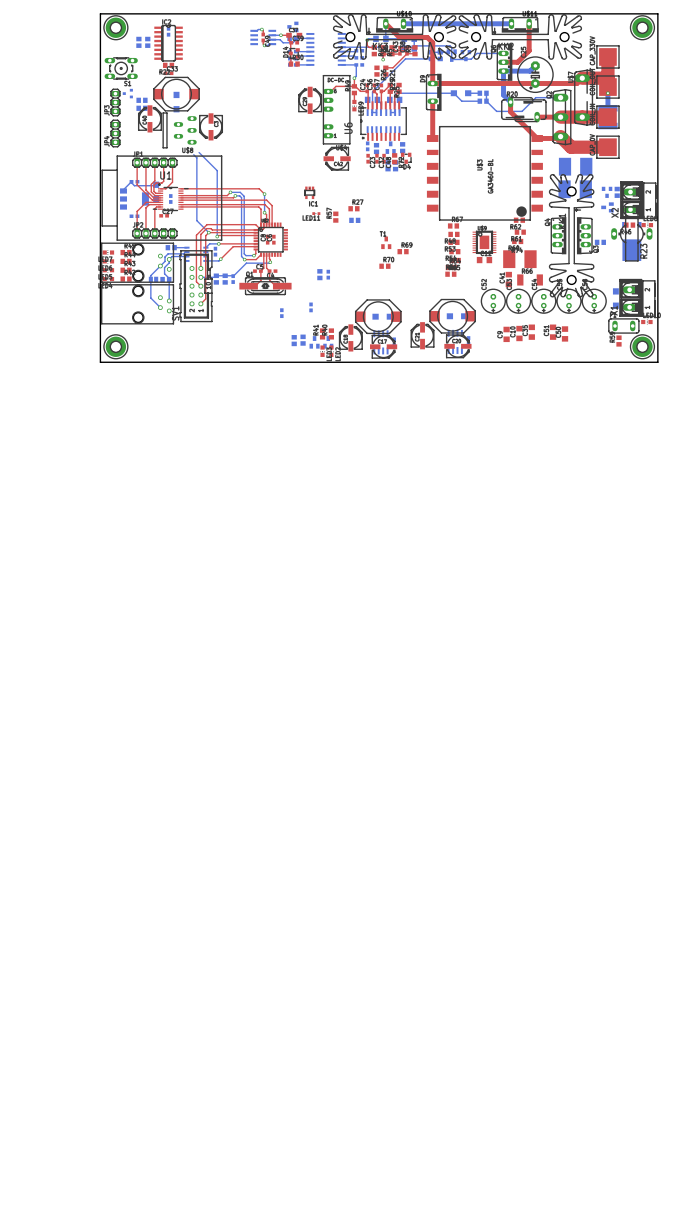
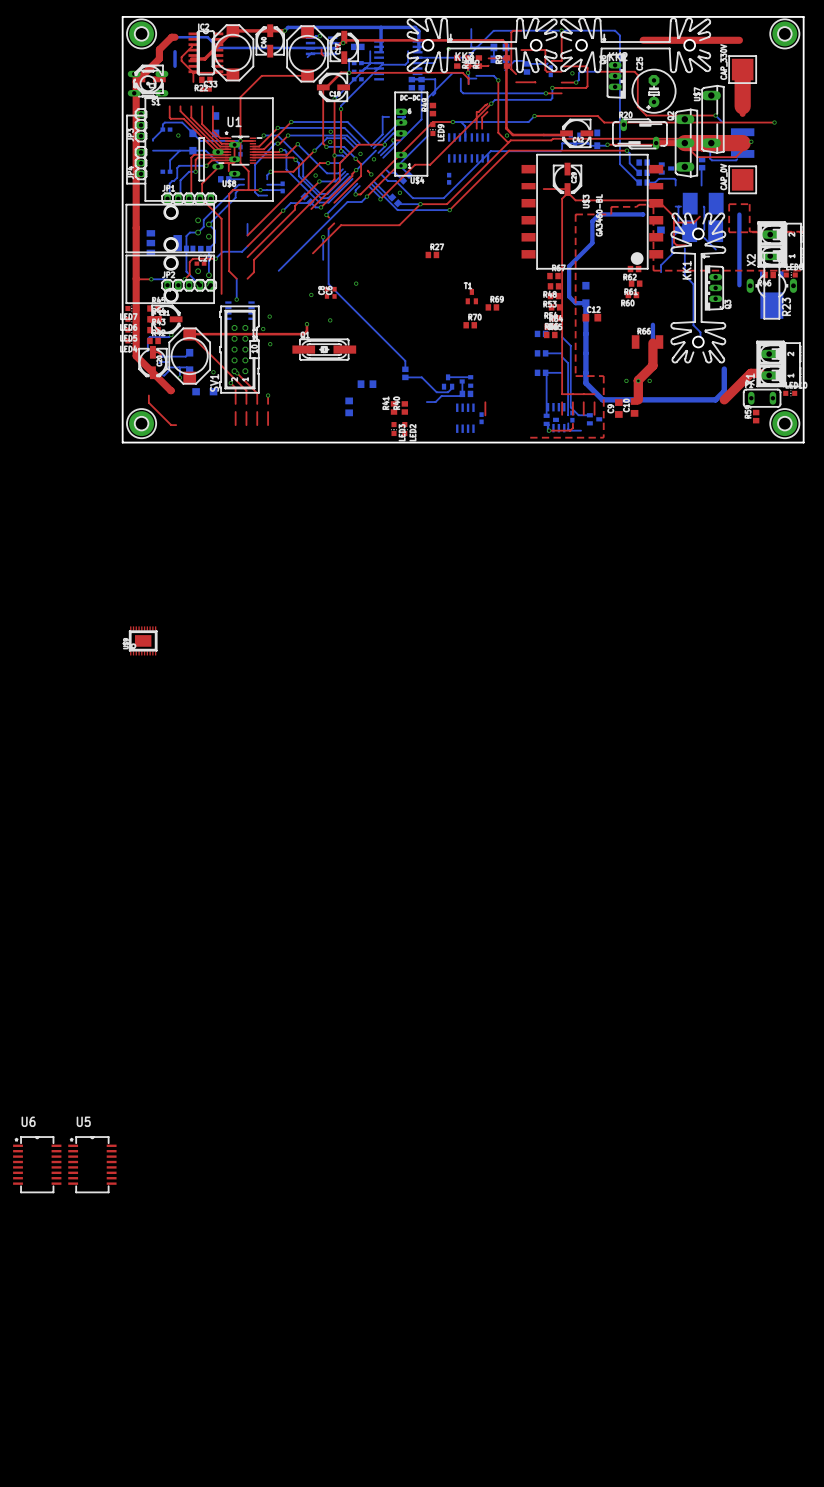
bottom track: none -> (381, 27) (381, 51)
top track: (385, 23) (399, 37) (427, 37) (432, 42) (432, 83) (576, 83) (582, 78) (607, 78) -> none
bottom track: (403, 23) (511, 23) -> none
top track: (529, 23) (529, 50) (517, 62) (503, 62) -> none
part: (394, 24) -> none
part: (520, 24) -> none
bottom track: none -> (284, 30) (288, 27) (415, 27) (418, 31) (418, 51)
top track: none -> (284, 30) (232, 30) (204, 58) (191, 58)
via: none -> (284, 30)
top track: none -> (521, 30) (511, 32) (511, 69) (516, 74)
top track: none -> (561, 30) (561, 60) (550, 62)
via: none -> (561, 30)
part: (292, 26) -> none
top track: (261, 29) (263, 34) -> none
bottom track: none -> (175, 37) (207, 37) (218, 47) (337, 46)
top track: none -> (175, 37) (171, 37) (159, 49) (159, 58) (136, 82) (136, 356) (171, 390)
part: (168, 31) -> none
top track: none -> (643, 40) (739, 40)
top track: (280, 35) (288, 35) (288, 40) (291, 42) (290, 64) -> none
part: (294, 35) -> none
top track: none -> (191, 44) (191, 46) (181, 57) (181, 60) (193, 72) (232, 74)
part: (263, 37) -> none
top track: none -> (337, 46) (344, 39) (502, 40) (506, 44) (506, 128) (512, 134) (564, 134) (566, 133)
bottom track: (310, 38) (296, 38) (292, 42) (272, 39) -> none
bottom track: (375, 38) (367, 40) -> none
part: (380, 38) -> none
top track: (367, 40) (367, 45) (374, 47) -> none
top track: none -> (521, 50) (545, 50) (545, 70) (561, 71)
bottom track: none -> (370, 51) (370, 63) (334, 99)
bottom track: none -> (408, 51) (408, 62) (405, 64) (382, 64) (341, 105) (341, 109)
part: (138, 42) -> none
bottom track: none -> (175, 51) (175, 66)
part: (147, 42) -> none
part: (294, 42) -> none
part: none -> (232, 52)
bottom track: none -> (328, 53) (311, 53) (307, 57)
part: none -> (307, 53)
via: (264, 45) -> none
bottom track: (414, 45) (449, 45) (451, 47) (451, 59) (471, 59) (476, 53) (503, 53) -> none
top track: (392, 47) (395, 50) (403, 50) (407, 53) -> none
bottom track: none -> (349, 58) (349, 72)
bottom track: none -> (523, 60) (514, 60) (505, 70)
part footprint: [446, 49, 457, 62] -> [548, 65, 553, 78]
part: (359, 50) -> none
part: (399, 50) -> none
part: (407, 50) -> none
part: (294, 53) -> none
top track: (407, 53) (415, 54) -> none
top track: (407, 53) (392, 67) (385, 67) -> none
top track: none -> (561, 66) (585, 66) (587, 86) (585, 87) (552, 87)
part: (440, 55) -> none
part position: (465, 55) -> (575, 139)
bottom track: (341, 56) (354, 56) (356, 57) -> none
part: (359, 57) -> none
bottom track: (431, 58) (405, 58) (372, 91) (372, 112) (376, 112) -> none
bottom track: none -> (599, 71) (580, 71) (578, 79) (576, 82)
top track: none -> (599, 71) (634, 71) (637, 74) (637, 106) (646, 115) (715, 115)
top track: none -> (193, 72) (193, 82)
via: none -> (349, 72)
bottom track: none -> (460, 73) (452, 73) (427, 98) (427, 136) (398, 164) (408, 174)
via: none -> (572, 73)
top track: none -> (307, 75) (261, 75) (240, 97) (240, 163) (248, 171) (248, 190)
bottom track: none -> (476, 75) (493, 75) (498, 80)
part: (294, 64) -> none
bottom track: (295, 64) (310, 64) -> none
part: (359, 64) -> none
bottom track: none -> (460, 78) (460, 90) (463, 93) (545, 93)
bottom track: none -> (468, 78) (476, 78)
top track: none -> (498, 80) (498, 132) (508, 142)
via: none -> (498, 80)
bottom track: (535, 65) (530, 71) (503, 71) (503, 95) (510, 102) -> none
top track: none -> (516, 82) (535, 82)
top track: none -> (561, 82) (576, 82)
via: none -> (576, 82)
part: none -> (411, 83)
part: none -> (421, 83)
bottom track: none -> (468, 84) (468, 55) (493, 30) (615, 30) (619, 35) (619, 164) (639, 182)
top track: none -> (468, 84) (468, 78) (462, 72) (341, 72) (326, 87) (323, 87) (323, 96)
bottom track: none -> (421, 87) (421, 119) (383, 157)
part: (376, 71) -> none
part: (385, 71) -> none
bottom track: none -> (552, 87) (550, 99) (495, 99) (491, 103)
via: none -> (552, 87)
top track: none -> (545, 93) (561, 93)
via: none -> (545, 93)
top track: none -> (323, 96) (323, 143) (326, 146)
top track: (354, 78) (354, 86) -> none
via: (354, 78) -> none
top track: none -> (334, 99) (334, 179) (254, 259) (254, 272) (247, 278)
via: none -> (334, 99)
top track: none -> (491, 103) (430, 164) (415, 164) (380, 199)
via: none -> (491, 103)
top track: (390, 85) (381, 91) (381, 105) -> none
top track: none -> (169, 106) (170, 118) (183, 118) (217, 152) (228, 152)
top track: none -> (180, 106) (180, 111) (218, 149) (228, 149)
top track: none -> (191, 106) (191, 117) (220, 146) (228, 146)
top track: none -> (202, 106) (202, 124) (221, 143) (228, 143)
top track: none -> (212, 106) (212, 130) (220, 138) (228, 138)
part: (607, 87) -> none
part: (367, 88) -> none
part: (374, 88) -> none
part: (381, 88) -> none
part: (390, 88) -> none
part: (399, 88) -> none
top track: none -> (341, 109) (341, 151)
via: none -> (341, 109)
top track: (328, 91) (336, 86) (355, 86) (360, 91) (368, 92) (368, 105) -> none
top track: (374, 91) (376, 93) (376, 105) -> none
part: (433, 92) -> none
part: (127, 93) -> none
top track: (354, 93) (354, 101) -> none
part: (461, 93) -> none
bottom track: (468, 93) (479, 93) -> none
part: (483, 93) -> none
bottom track: (486, 93) (486, 101) (496, 111) (522, 111) (535, 97) (560, 97) -> none
bottom track: (607, 93) (607, 108) -> none
via: (607, 93) -> none
part: (176, 94) -> none
bottom track: none -> (715, 115) (721, 121)
via: none -> (715, 115)
bottom track: none -> (389, 116) (382, 116) (382, 134) (371, 145)
bottom track: none -> (397, 116) (404, 116) (373, 148)
bottom track: none -> (534, 116) (528, 122) (452, 122)
top track: none -> (534, 116) (597, 116) (604, 122) (774, 122)
via: none -> (534, 116)
bottom track: none -> (291, 122) (347, 122) (368, 143)
top track: none -> (291, 122) (264, 149) (252, 149)
via: none -> (291, 122)
top track: none -> (452, 122) (432, 122) (360, 194) (355, 194)
via: none -> (452, 122)
part: (372, 99) -> none
part: (394, 99) -> none
part: (142, 100) -> none
part rotation: 0° (310, 100) -> 180° (567, 179)
part position: (310, 100) -> (567, 179)
via: none -> (774, 122)
top track: (432, 101) (432, 138) -> none
bottom track: (479, 101) (461, 101) (453, 93) (396, 93) (394, 95) (395, 112) (390, 112) -> none
part: (483, 101) -> none
top track: (510, 102) (510, 111) (537, 138) (558, 138) (560, 136) (571, 147) (607, 147) -> none
bottom track: none -> (277, 127) (344, 127) (359, 143)
top track: none -> (277, 127) (259, 146) (252, 146)
via: none -> (277, 127)
part: none -> (166, 129)
via: none -> (330, 131)
part: (142, 108) -> none
bottom track: none -> (398, 133) (393, 133) (384, 142) (384, 146) (378, 153)
via: none -> (178, 135)
bottom track: none -> (263, 135) (277, 135) (303, 160) (303, 176) (320, 193) (327, 193) (347, 174)
via: none -> (263, 135)
bottom track: none -> (288, 135) (347, 135) (357, 145)
top track: none -> (288, 135) (277, 143)
via: none -> (288, 135)
via: none -> (506, 135)
bottom track: none -> (393, 140) (393, 143) (380, 155)
top track: none -> (393, 140) (400, 140)
via: none -> (393, 140)
part: none -> (597, 139)
bottom track: none -> (153, 140) (162, 129) (164, 122) (182, 122) (200, 140) (240, 140) (240, 147)
top track: none -> (228, 140) (234, 142) (234, 162) (222, 163) (202, 183) (202, 199) (221, 218) (221, 293)
top track: none -> (240, 140) (252, 140)
via: none -> (240, 140)
part: none -> (192, 142)
via: none -> (330, 142)
bottom track: none -> (703, 142) (710, 149) (711, 160) (737, 159)
top track: none -> (751, 141) (735, 157) (697, 157) (684, 144) (607, 144)
via: none -> (751, 141)
bottom track: none -> (277, 143) (275, 143) (255, 164) (255, 192) (258, 195) (267, 195)
via: none -> (277, 143)
part: (607, 117) -> none
part position: (149, 118) -> (270, 40)
bottom track: none -> (297, 144) (326, 173) (338, 173) (342, 169)
top track: none -> (297, 144) (287, 154) (252, 154)
via: none -> (297, 144)
top track: none -> (384, 144) (358, 144) (339, 163) (339, 180) (311, 209)
via: none -> (384, 144)
bottom track: none -> (607, 144) (590, 145) (588, 142) (562, 143) (560, 151) (490, 151) (443, 198) (412, 198) (395, 181) (387, 181) (380, 174)
via: none -> (607, 144)
bottom track: none -> (326, 146) (344, 146) (355, 158)
via: none -> (326, 146)
bottom track: none -> (354, 148) (345, 138) (326, 138) (314, 150)
U6 rotation: 0° (383, 121) -> 90° clockwise (37, 1164)
U6 position: (383, 121) -> (37, 1164)
bottom track: none -> (281, 150) (286, 151) (286, 169) (319, 202) (328, 202) (352, 178)
top track: none -> (281, 150) (279, 152) (252, 152)
via: none -> (281, 150)
bottom track: none -> (153, 150) (205, 150) (220, 165)
bottom track: none -> (179, 150) (170, 160) (170, 171)
part: none -> (240, 150)
top track: none -> (314, 150) (293, 171) (270, 171)
via: none -> (314, 150)
bottom track: none -> (341, 151) (347, 155)
via: none -> (341, 151)
bottom track: none -> (376, 150) (356, 170)
bottom track: none -> (626, 150) (629, 153) (629, 163) (638, 172)
top track: none -> (626, 150) (509, 150) (449, 210)
via: none -> (626, 150)
top track: none -> (702, 151) (689, 138) (510, 140) (446, 204) (420, 204) (399, 225) (341, 225) (312, 253)
via: none -> (360, 153)
top track: none -> (228, 154) (194, 154) (191, 157) (191, 192)
part rotation: 0° (211, 126) -> 90° clockwise (149, 79)
part position: (211, 126) -> (149, 79)
bottom track: none -> (334, 155) (342, 155) (345, 157)
via: none -> (334, 155)
top track: none -> (228, 157) (197, 157) (195, 159) (195, 171)
top track: none -> (252, 157) (293, 157) (295, 159)
top track: none -> (355, 158) (361, 164) (361, 176) (334, 202)
via: none -> (355, 158)
bottom track: none -> (295, 159) (298, 163) (298, 176) (321, 198) (328, 198) (350, 176)
via: none -> (295, 159)
via: none -> (374, 159)
top track: none -> (228, 160) (211, 160) (206, 165)
bottom track: none -> (342, 160) (340, 163) (328, 163)
top track: none -> (228, 163) (228, 171)
top track: none -> (328, 163) (319, 163) (247, 235)
via: none -> (328, 163)
part: none -> (643, 162)
part: none -> (702, 163)
top track: none -> (398, 164) (366, 196)
bottom track: none -> (206, 165) (179, 165) (177, 167) (177, 177) (169, 183) (169, 192)
via: none -> (206, 165)
part: none -> (666, 168)
bottom track: none -> (702, 167) (701, 185)
bottom track: none -> (385, 169) (389, 172) (395, 172) (403, 180)
top track: none -> (356, 170) (321, 207)
via: none -> (356, 170)
top track: none -> (367, 170) (371, 174)
part: none -> (166, 171)
bottom track: none -> (195, 171) (189, 171) (180, 180) (180, 192)
via: none -> (195, 171)
bottom track: none -> (270, 171) (267, 175) (267, 179)
via: none -> (270, 171)
bottom track: none -> (345, 171) (335, 181) (319, 181)
part: none -> (643, 172)
via: none -> (371, 174)
via: none -> (315, 175)
part: none -> (224, 179)
bottom track: none -> (228, 179) (244, 179)
part: (390, 147) -> none
part: (402, 147) -> none
top track: none -> (319, 181) (295, 205) (295, 209) (247, 257)
via: none -> (319, 181)
bottom track: none -> (373, 181) (389, 197) (392, 197)
part: (376, 148) -> none
part: none -> (643, 182)
bottom track: none -> (647, 182) (655, 182) (658, 178) (674, 178) (675, 185)
bottom track: none -> (282, 183) (267, 184)
bottom track: none -> (357, 183) (326, 214)
bottom track: none -> (371, 183) (397, 210) (449, 210)
bottom track: none -> (244, 184) (238, 184) (203, 219) (203, 226) (198, 232)
bottom track: (199, 152) (217, 170) (217, 236) -> none
bottom track: none -> (359, 186) (355, 190) (355, 194)
bottom track: none -> (368, 186) (380, 199)
part: none -> (282, 187)
bottom track: (193, 154) (196, 157) (196, 220) (208, 232) -> none
top track: none -> (543, 189) (567, 189) (567, 193)
bottom track: none -> (244, 190) (238, 190) (235, 192) (235, 197) (208, 224) (215, 230) (215, 242) (208, 249)
bottom track: none -> (260, 190) (283, 191)
top track: none -> (260, 190) (232, 190) (229, 193) (229, 271) (236, 278)
via: none -> (260, 190)
line: (117, 156) (221, 156) (221, 240) (117, 240) (117, 156) -> (145, 98) (272, 98) (272, 200) (145, 200) (145, 98)
via: none -> (399, 192)
part position: (337, 158) -> (576, 133)
part: (368, 158) -> none
part: (376, 158) -> none
part: (384, 158) -> none
part: (394, 158) -> none
part: (406, 158) -> none
top track: none -> (567, 193) (562, 198) (562, 394) (594, 394)
top track: none -> (567, 193) (575, 200) (657, 200) (674, 216) (674, 242) (676, 245) (686, 245)
via: none -> (355, 194)
bottom track: none -> (366, 196) (361, 202) (347, 202) (278, 270)
via: none -> (366, 196)
top track: (137, 162) (137, 184) (152, 200) (160, 200) -> none
top track: (145, 162) (145, 190) (153, 197) (160, 197) -> none
top track: (154, 162) (154, 180) (151, 184) (151, 191) (155, 195) (160, 195) -> none
top track: (163, 162) (163, 181) (153, 185) (153, 191) (160, 193) -> none
top track: (172, 162) (172, 182) (165, 188) (160, 188) -> none
part: none -> (307, 199)
via: none -> (380, 199)
part: none -> (395, 200)
part: (388, 165) -> none
part: (395, 165) -> none
bottom track: none -> (397, 203) (420, 204)
via: none -> (420, 204)
bottom track: none -> (321, 207) (315, 207) (310, 202) (290, 203) (283, 210)
via: none -> (321, 207)
bottom track: none -> (675, 206) (681, 206)
bottom track: none -> (678, 206) (678, 231) (672, 237) (672, 253) (661, 265) (661, 272)
bottom track: none -> (703, 206) (704, 229)
line: (117, 170) (102, 170) (102, 225) (117, 225) -> (145, 115) (126, 115) (126, 183) (145, 183)
top track: none -> (283, 210) (247, 246)
via: none -> (283, 210)
via: none -> (449, 210)
top track: none -> (326, 214) (329, 217)
via: none -> (326, 214)
bottom track: none -> (643, 214) (599, 214) (592, 221) (592, 243) (569, 266) (569, 296) (575, 303) (585, 303) (585, 320)
bottom track: none -> (739, 214) (739, 285)
top track: none -> (699, 216) (694, 222) (674, 222)
part: (134, 181) -> none
top track: none -> (334, 223) (328, 229)
bottom track: none -> (247, 223) (247, 235)
bottom track: (156, 184) (134, 185) (131, 181) (123, 190) -> none
part: none -> (170, 228)
bottom track: none -> (328, 229) (328, 284) (405, 360) (405, 369)
top track: (180, 188) (259, 188) (264, 194) -> none
part: none -> (669, 230)
top zone outline: none -> (803, 231) (749, 231) (749, 204) (729, 204) (729, 232) (803, 232)
bottom track: none -> (198, 232) (189, 232) (186, 236) (186, 271) (198, 283)
part: (156, 191) -> none
bottom track: (230, 192) (240, 192) (244, 196) (244, 253) (253, 255) -> none
top track: (230, 192) (227, 195) (180, 195) -> none
via: (230, 192) -> none
part: (309, 192) -> none
part: (607, 192) -> none
part: (617, 192) -> none
bottom track: none -> (704, 237) (715, 249)
bottom track: (235, 195) (241, 197) (241, 256) (244, 259) -> none
top track: (235, 195) (233, 197) (180, 197) -> none
via: (235, 195) -> none
U1 position: (170, 198) -> (240, 150)
part: (170, 198) -> none
top track: (180, 200) (266, 200) (272, 205) (272, 224) -> none
bottom track: none -> (247, 246) (242, 251) (222, 251) (215, 258)
top track: (160, 202) (146, 202) (137, 211) (137, 233) -> none
part: none -> (204, 249)
bottom track: none -> (208, 249) (208, 275)
bottom track: none -> (684, 248) (684, 275) (693, 284) (693, 325) (700, 332) (700, 343)
top track: (160, 204) (149, 204) (145, 207) (145, 233) -> none
top track: (180, 204) (264, 204) (269, 209) (269, 224) -> none
top track: (160, 206) (154, 208) (154, 233) -> none
top track: (180, 206) (258, 206) (261, 209) (261, 224) -> none
part: (607, 207) -> none
top track: none -> (215, 258) (192, 258) (189, 262) (189, 274) (184, 279)
via: none -> (215, 258)
top track: (264, 212) (266, 214) (266, 224) -> none
via: (264, 212) -> none
part: (316, 213) -> none
part: (134, 216) -> none
part side: top (335, 217) -> bottom (405, 177)
part: (354, 220) -> none
top zone outline: none -> (803, 270) (653, 270) (653, 206) (647, 204) (638, 204) (636, 206) (611, 206) (611, 214) (575, 214) (575, 376) (603, 376) (603, 437) (530, 437)
top track: (263, 224) (263, 228) (260, 229) (255, 224) (207, 224) (196, 235) (196, 281) (200, 286) -> none
top track: none -> (136, 278) (151, 279)
bottom track: none -> (151, 279) (166, 279)
via: none -> (151, 279)
via: none -> (184, 279)
bottom track: none -> (236, 278) (236, 299)
top track: (255, 229) (206, 228) (200, 234) (200, 268) -> none
via: (208, 232) -> none
top track: (255, 232) (208, 232) (205, 235) (205, 298) (200, 303) -> none
via: none -> (356, 283)
top track: (255, 235) (217, 236) -> none
part: (558, 235) -> none
via: (217, 236) -> none
part: (270, 239) -> none
via: none -> (311, 294)
part: none -> (585, 294)
part rotation: 0° (484, 242) -> 90° counterclockwise (143, 640)
part position: (484, 242) -> (143, 640)
part: (600, 242) -> none
bottom track: (218, 243) (209, 243) (205, 247) -> none
top track: (218, 243) (255, 243) -> none
via: (218, 243) -> none
via: none -> (236, 299)
top track: (255, 246) (233, 246) (220, 259) -> none
part: (171, 247) -> none
bottom track: (174, 247) (186, 247) -> none
top track: (255, 249) (253, 255) -> none
part: (215, 251) -> none
bottom track: (186, 252) (168, 253) (165, 256) (165, 261) (150, 275) (150, 298) (160, 307) -> none
top track: (261, 254) (256, 259) (244, 259) -> none
top track: (263, 254) (263, 268) (260, 271) (260, 280) (255, 286) (248, 286) -> none
top track: (266, 254) (266, 268) (269, 271) (269, 280) (275, 286) (282, 286) -> none
top track: (269, 254) (270, 262) -> none
via: (253, 255) -> none
bottom track: (186, 256) (172, 256) (164, 267) (164, 273) (169, 279) (169, 300) -> none
bottom track: (220, 259) (218, 260) (205, 260) -> none
via: (244, 259) -> none
part: (519, 259) -> none
part position: (137, 262) -> (170, 279)
bottom track: (270, 262) (246, 263) (233, 276) (200, 277) -> none
bottom track: none -> (585, 321) (585, 383) (602, 399) (715, 399) (724, 391) (724, 369)
top track: none -> (306, 323) (306, 331) (304, 334) (189, 334) (246, 390) (246, 403)
via: none -> (306, 324)
bottom track: none -> (652, 324) (652, 343)
via: none -> (263, 329)
part: (257, 271) -> none
part: (272, 271) -> none
part: none -> (541, 333)
bottom track: none -> (562, 333) (562, 337) (570, 345) (570, 407) (578, 415) (589, 415)
bottom track: none -> (171, 334) (169, 337) (149, 337) (147, 338) (147, 351)
via: none -> (171, 334)
part: (319, 274) -> none
part: (328, 274) -> none
part position: (153, 279) -> (189, 249)
part: (165, 279) -> none
part: (216, 279) -> none
part: (225, 279) -> none
part: (233, 279) -> none
part: (508, 279) -> none
top track: none -> (652, 343) (652, 365) (638, 380) (638, 399)
via: none -> (270, 344)
top track: none -> (152, 352) (158, 352) (161, 354)
bottom track: none -> (189, 352) (185, 356) (162, 356) (161, 354)
part: none -> (541, 353)
bottom track: none -> (545, 353) (562, 353) (562, 357) (568, 363) (568, 415)
part: none -> (189, 356)
part: none -> (189, 361)
bottom track: none -> (168, 362) (159, 363)
part: (615, 298) -> none
bottom track: none -> (179, 367) (179, 377)
part: (493, 301) -> none
part: (518, 301) -> none
part: (543, 301) -> none
part: (569, 301) -> none
part: (594, 301) -> none
bottom track: none -> (189, 370) (186, 367) (168, 367) (168, 371) (163, 375)
part: (137, 304) -> none
via: none -> (213, 372)
top track: none -> (237, 373) (257, 393) (257, 403)
via: none -> (237, 373)
part: none -> (405, 373)
part: none -> (541, 372)
bottom track: none -> (562, 372) (545, 372) (546, 415)
top track: none -> (760, 373) (750, 373) (724, 399)
part: (311, 307) -> none
bottom track: none -> (405, 377) (421, 377) (436, 392) (448, 392) (452, 386)
bottom track: none -> (470, 377) (448, 377)
via: none -> (179, 377)
via: none -> (626, 380)
via: none -> (638, 380)
via: none -> (649, 380)
part: none -> (448, 382)
bottom track: none -> (462, 381) (462, 393) (460, 396) (441, 396) (435, 402) (426, 402)
part: none -> (466, 381)
top track: none -> (230, 383) (235, 387) (235, 403)
via: none -> (230, 383)
part: (281, 313) -> none
part: none -> (366, 384)
part: (378, 316) -> none
part: (382, 316) -> none
part: (452, 316) -> none
part: (457, 316) -> none
part: none -> (204, 391)
part: none -> (466, 393)
top track: none -> (148, 395) (148, 402) (171, 425) (176, 425)
top track: none -> (268, 395) (268, 403)
via: none -> (268, 395)
top track: none -> (485, 402) (485, 415)
top track: none -> (562, 402) (562, 414)
top track: none -> (572, 402) (572, 414)
top track: none -> (583, 402) (583, 414)
top track: none -> (594, 402) (594, 414)
part: (531, 332) -> none
part: (553, 332) -> none
part: none -> (349, 406)
part: (565, 333) -> none
part rotation: 0° (422, 335) -> 90° clockwise (165, 319)
part position: (422, 335) -> (165, 319)
top track: none -> (235, 412) (235, 425)
top track: none -> (246, 412) (246, 425)
top track: none -> (257, 412) (257, 425)
top track: none -> (268, 412) (268, 425)
part rotation: 0° (350, 337) -> 90° counterclockwise (333, 87)
part position: (350, 337) -> (333, 87)
part: (294, 340) -> none
part: (303, 340) -> none
part: (314, 342) -> none
part: (328, 342) -> none
part: none -> (551, 419)
part: none -> (594, 419)
part rotation: 0° (383, 346) -> 90° counterclockwise (344, 47)
part position: (383, 346) -> (344, 47)
part rotation: 0° (457, 346) -> 90° clockwise (152, 362)
part position: (457, 346) -> (152, 362)
bottom track: none -> (568, 423) (569, 430) (581, 430)
top track: none -> (572, 423) (572, 427) (570, 430) (549, 430)
via: none -> (549, 430)
U5: none -> (92, 1164)

